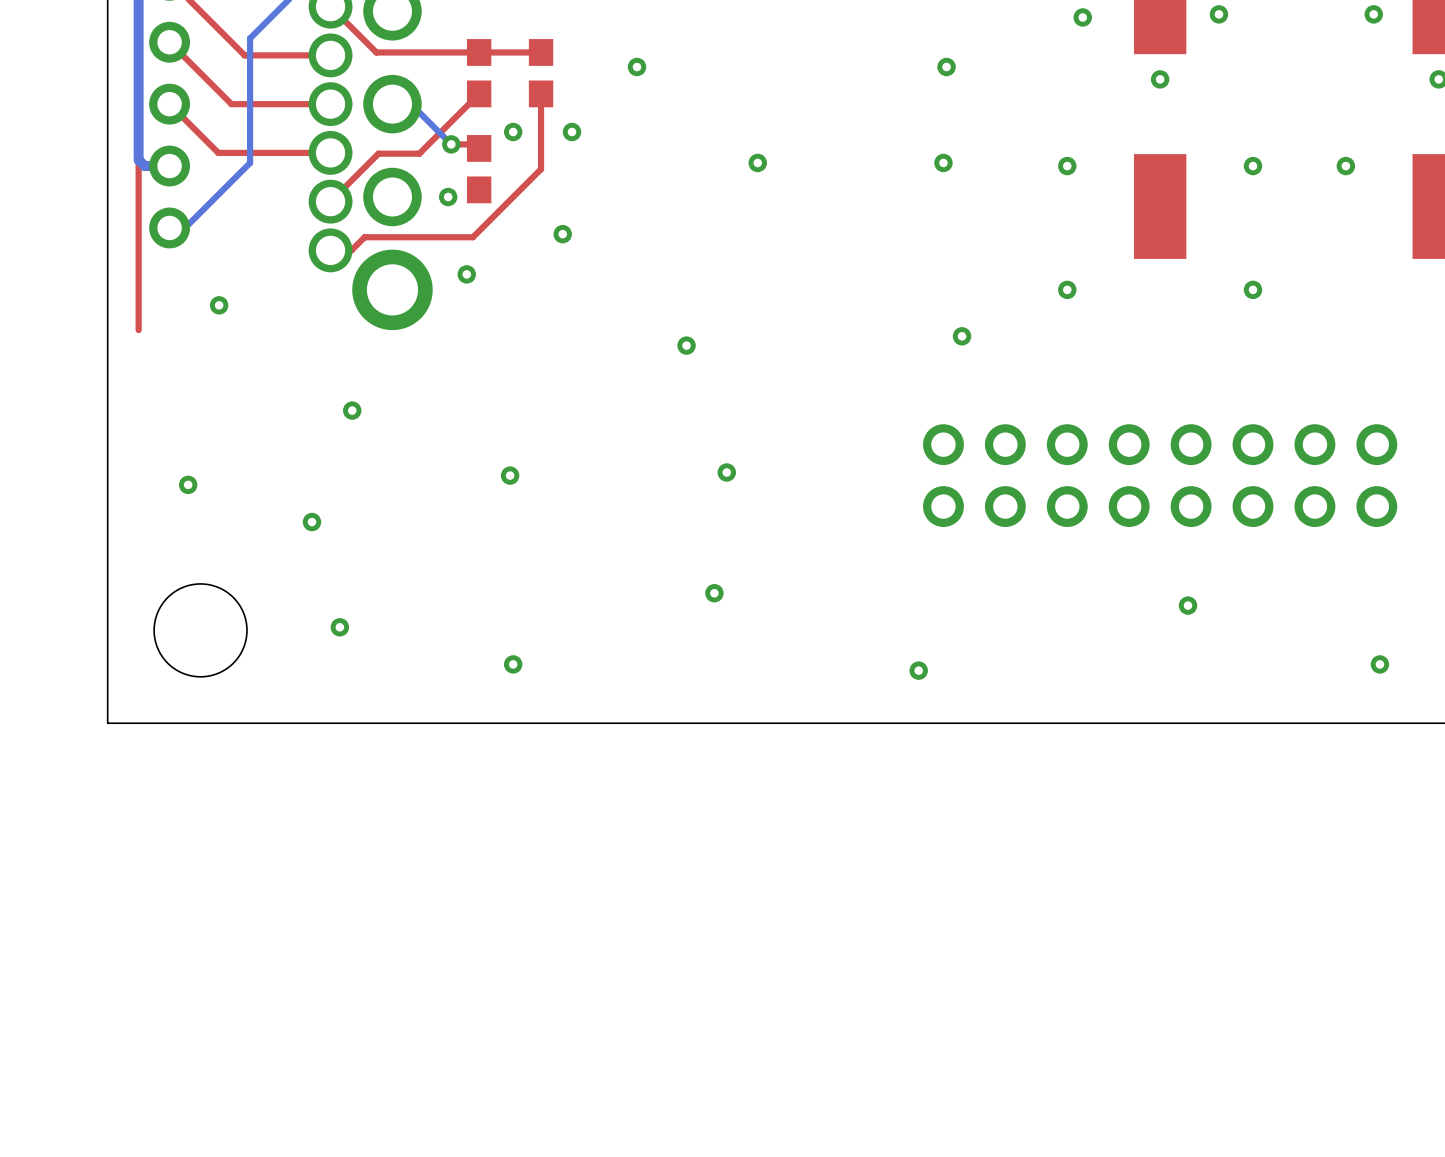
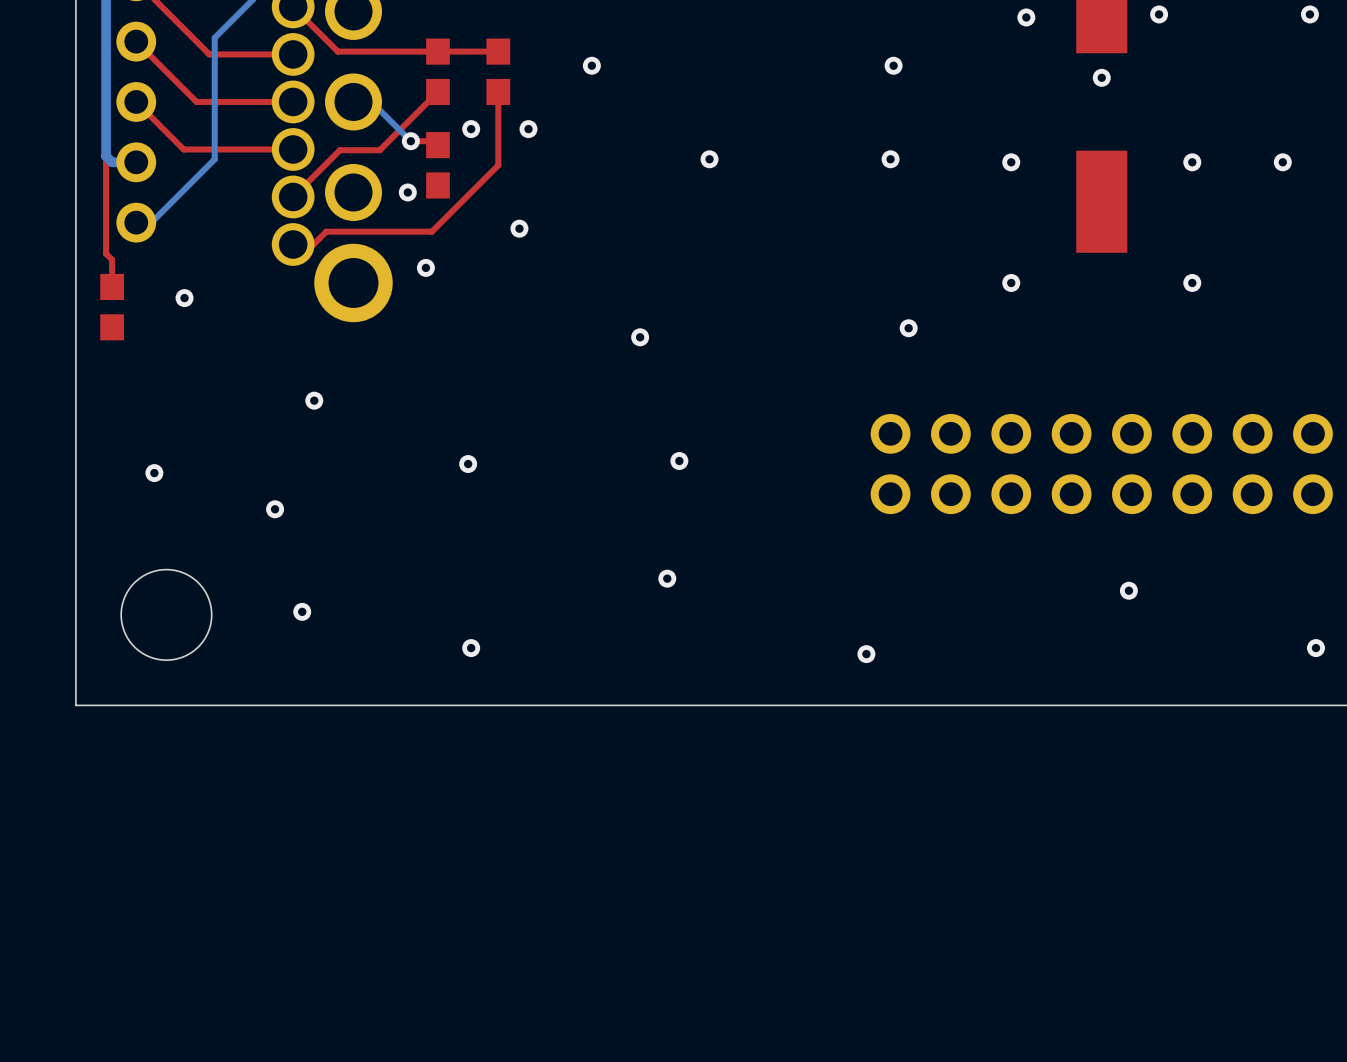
top track: (138, 259) (138, 330) -> (106, 253) (112, 259) (112, 286)
part: none -> (112, 307)

